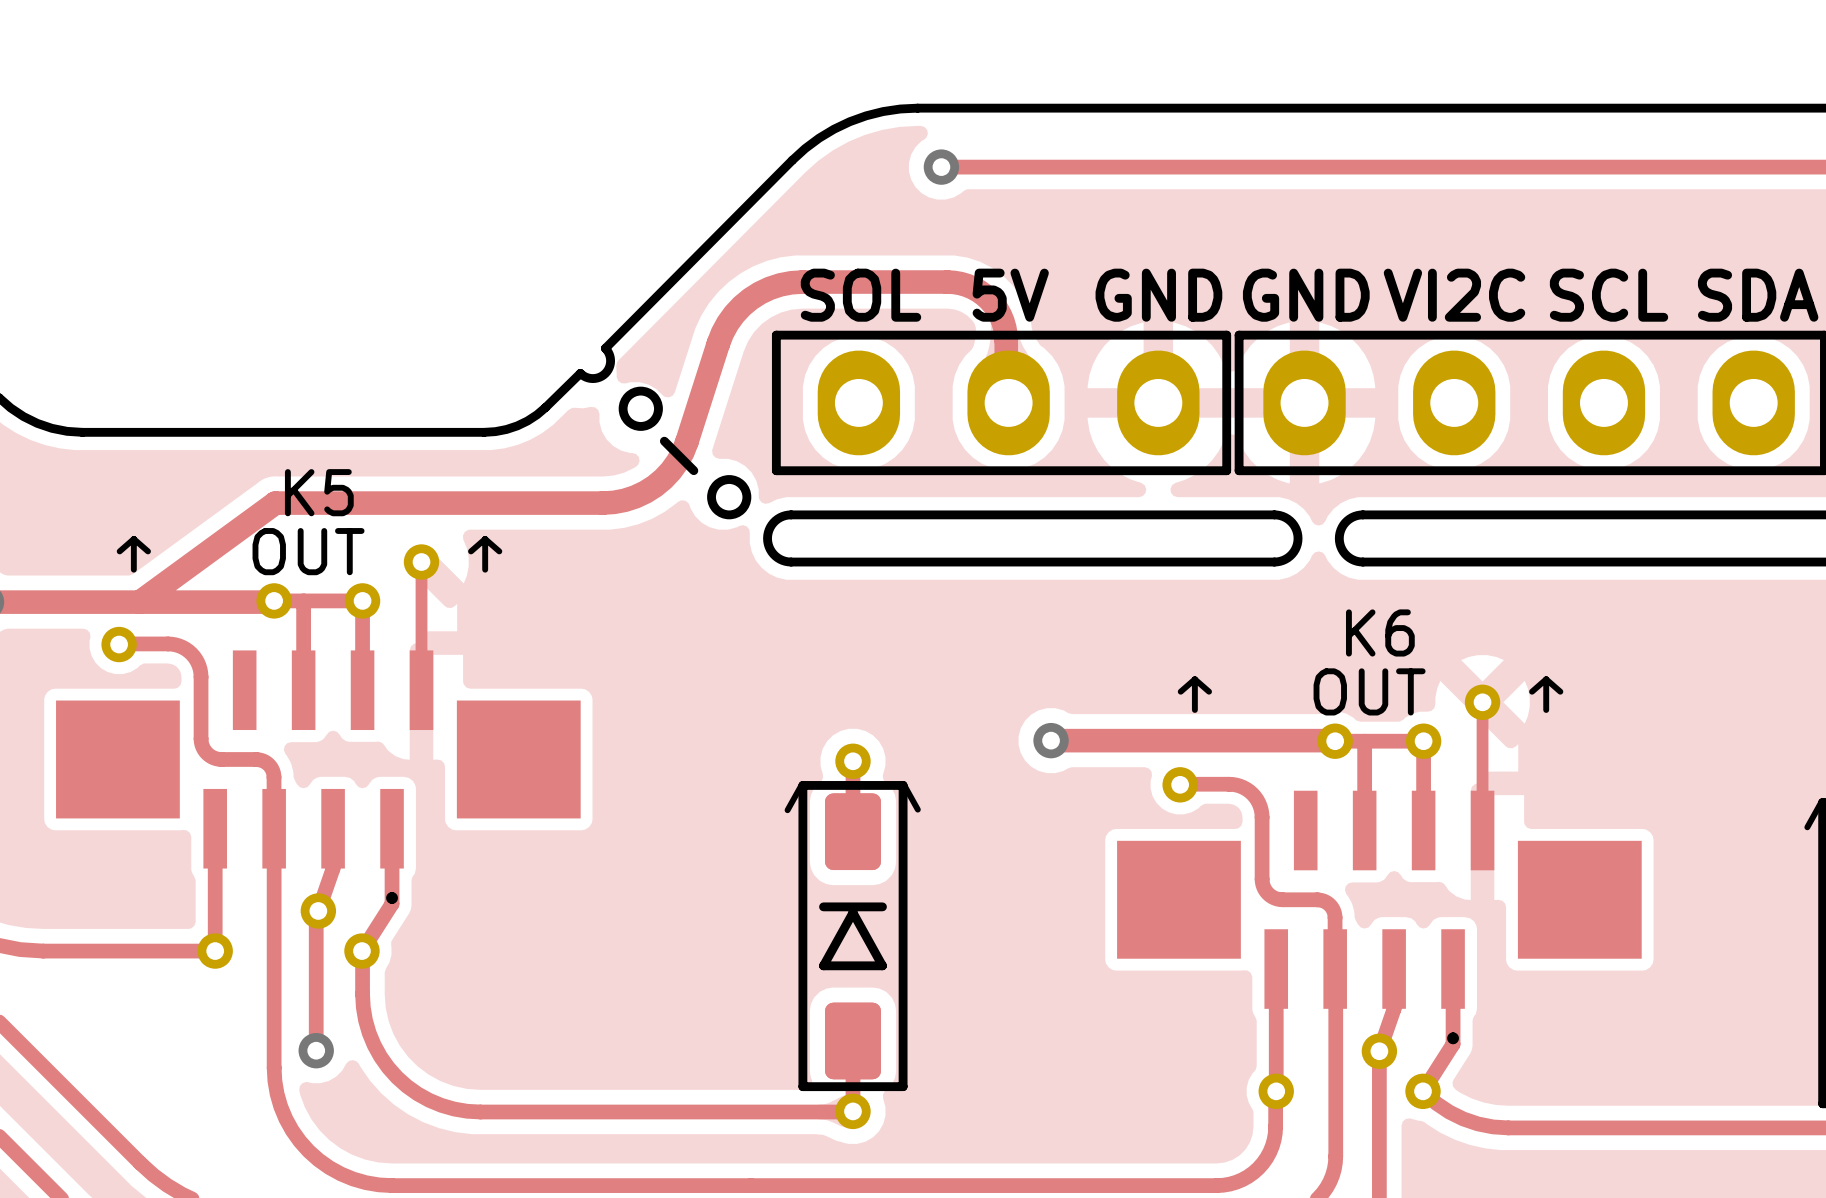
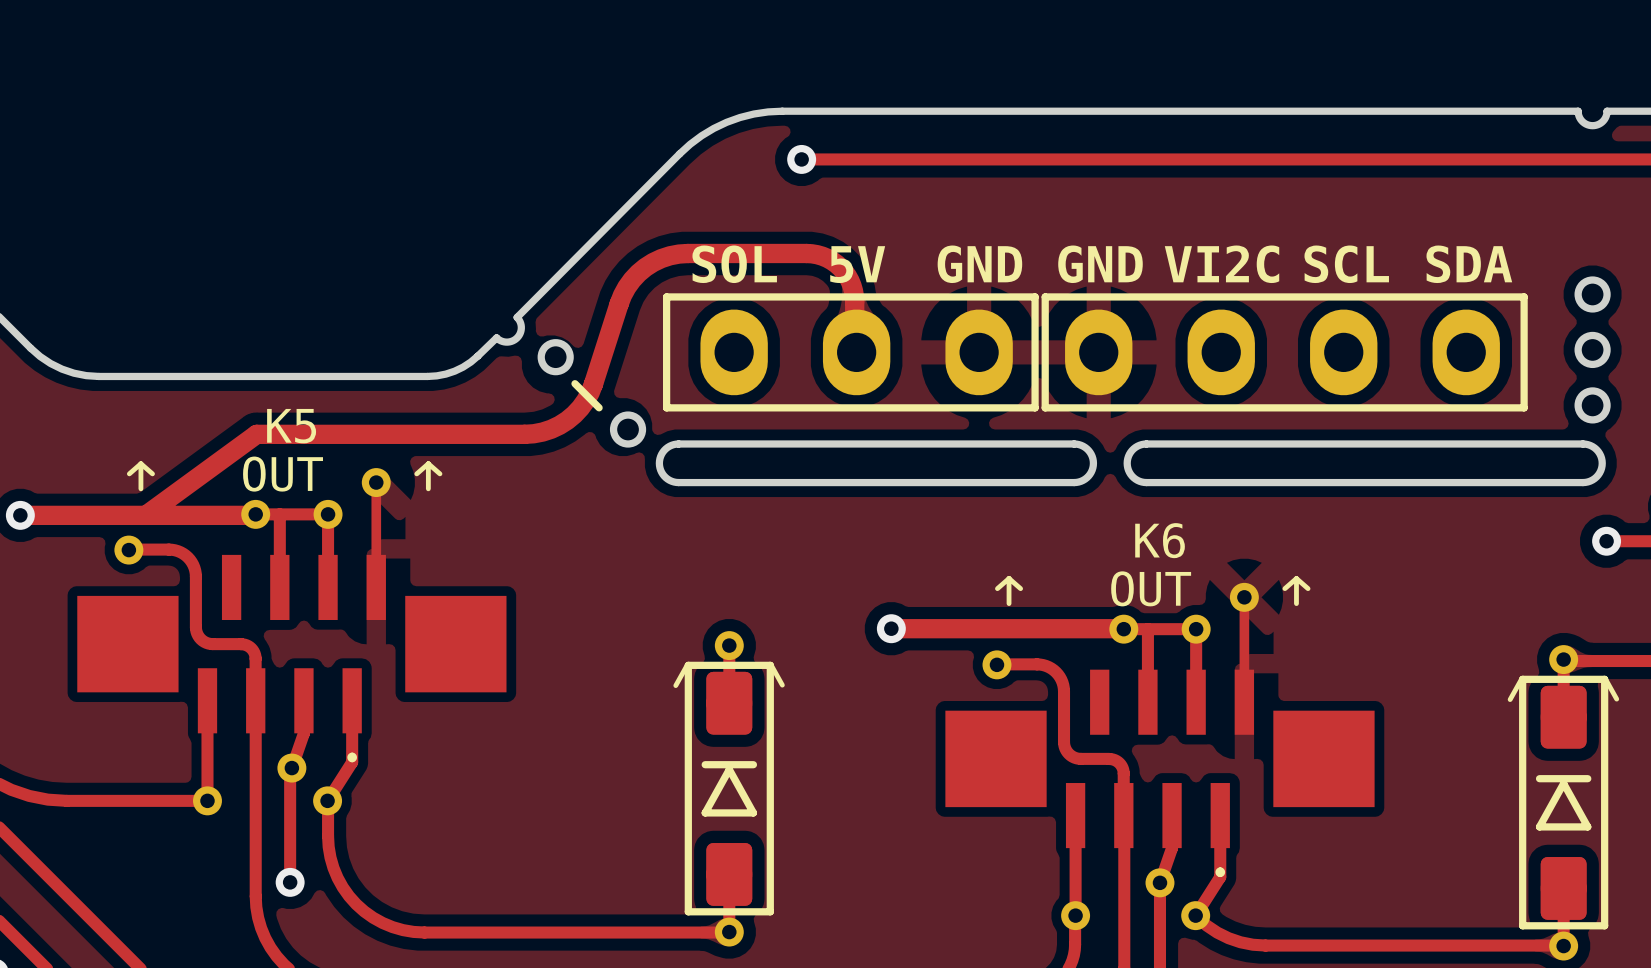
board edge: (792, 160) (605, 348) (610, 360) (605, 373) (592, 378) (580, 373) (545, 407) -> (679, 153) (517, 317) (521, 326) (517, 337) (506, 342) (496, 337) (477, 356)

